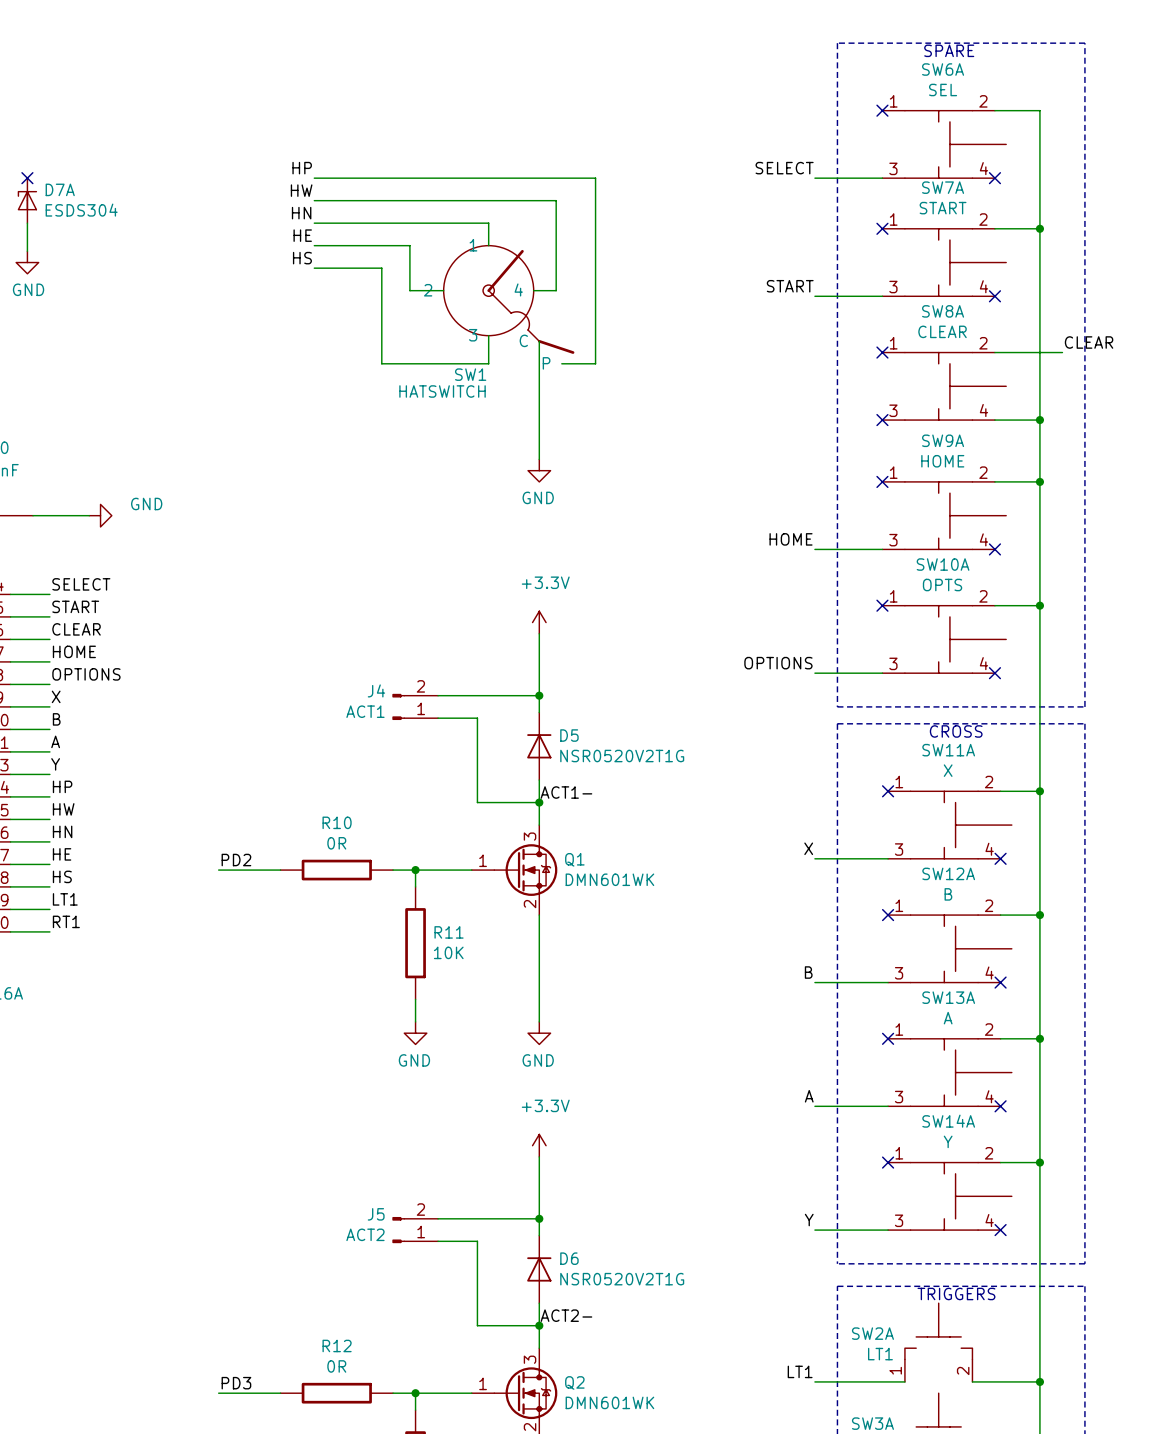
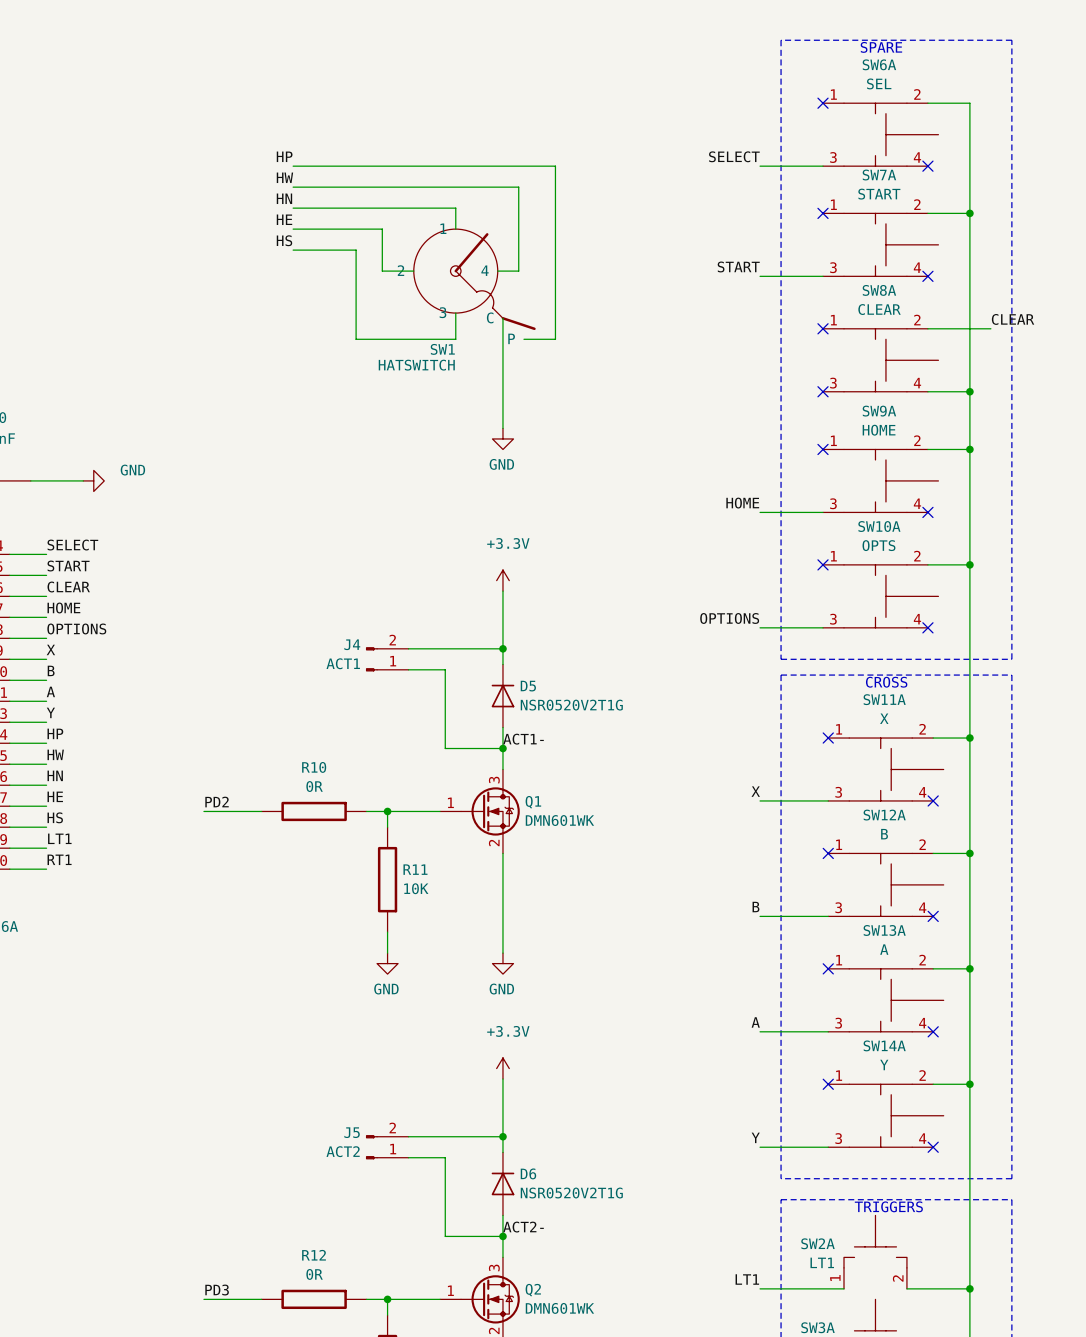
no-connect mark: (27, 178) -> none
D7A: ESDS304 (27, 200) -> none
wire: (27, 223) (27, 251) -> none
power symbol: GND (27, 262) -> none

